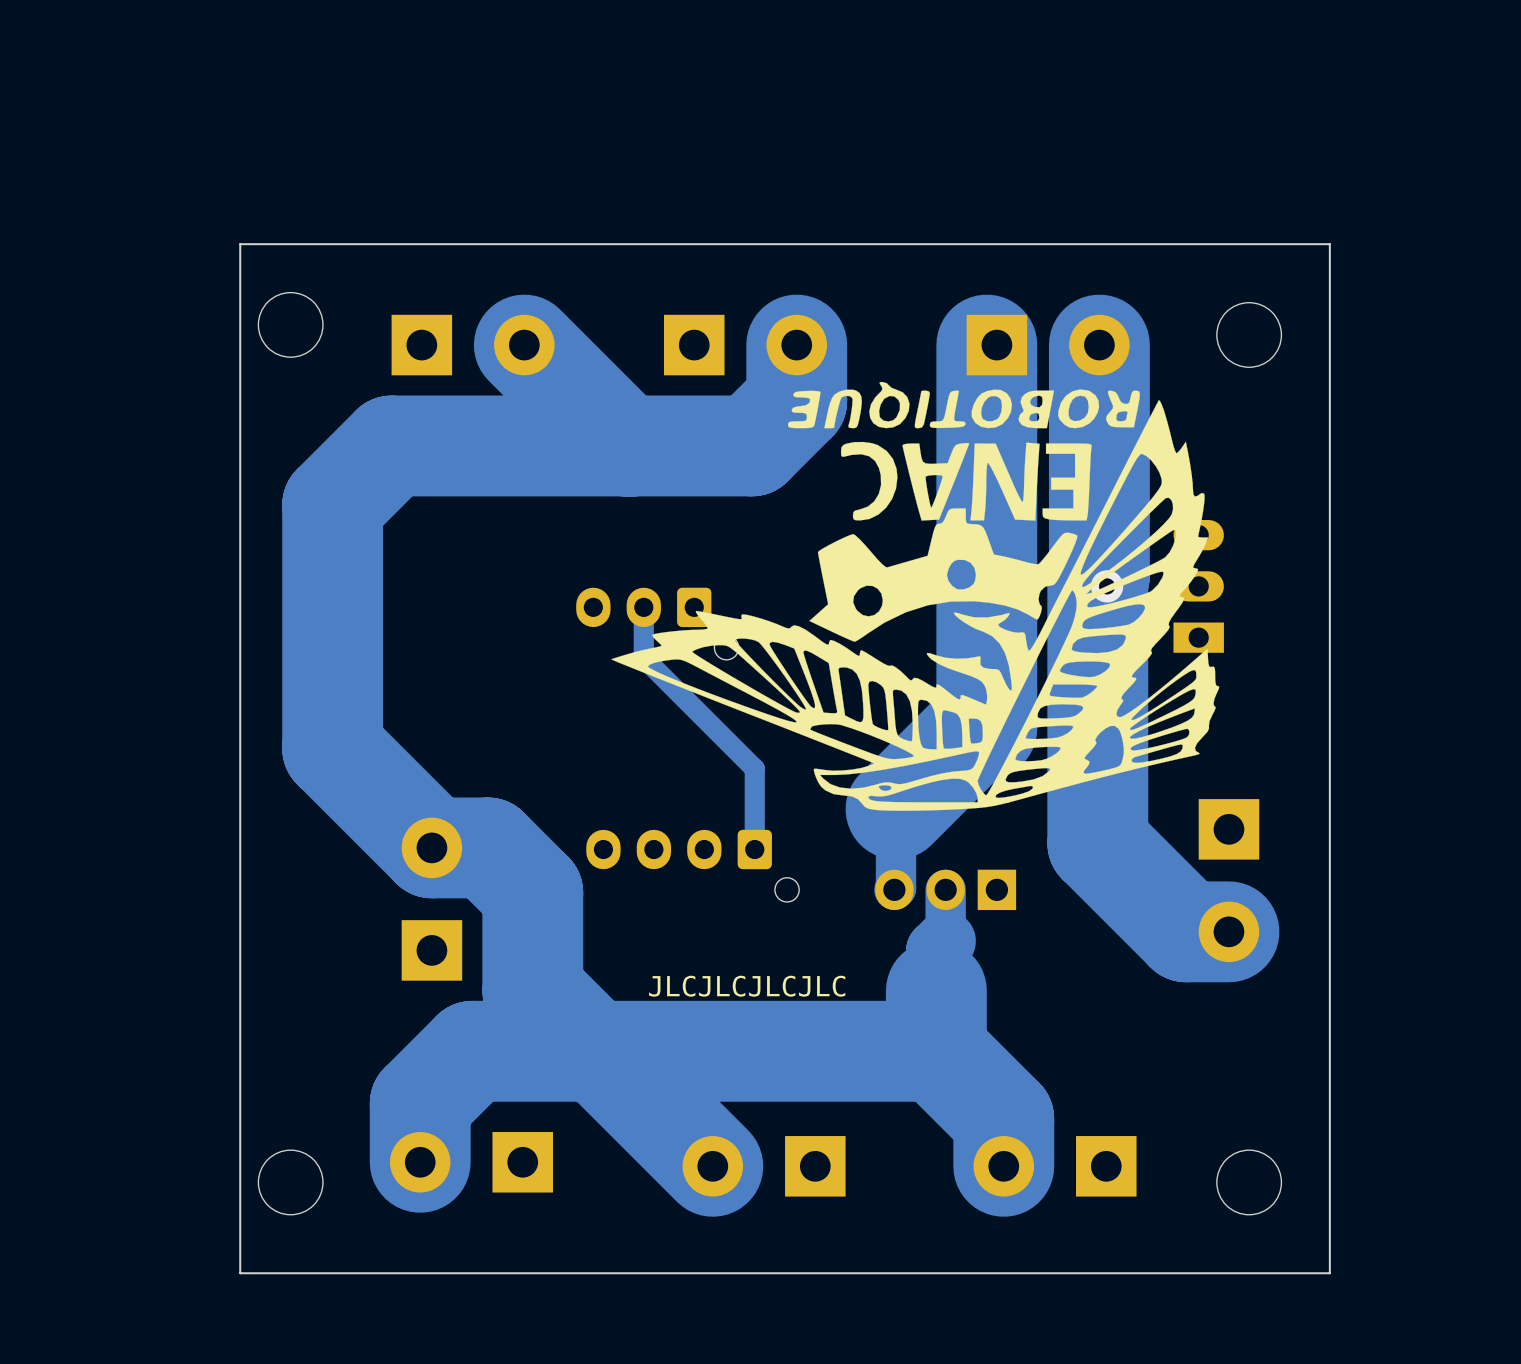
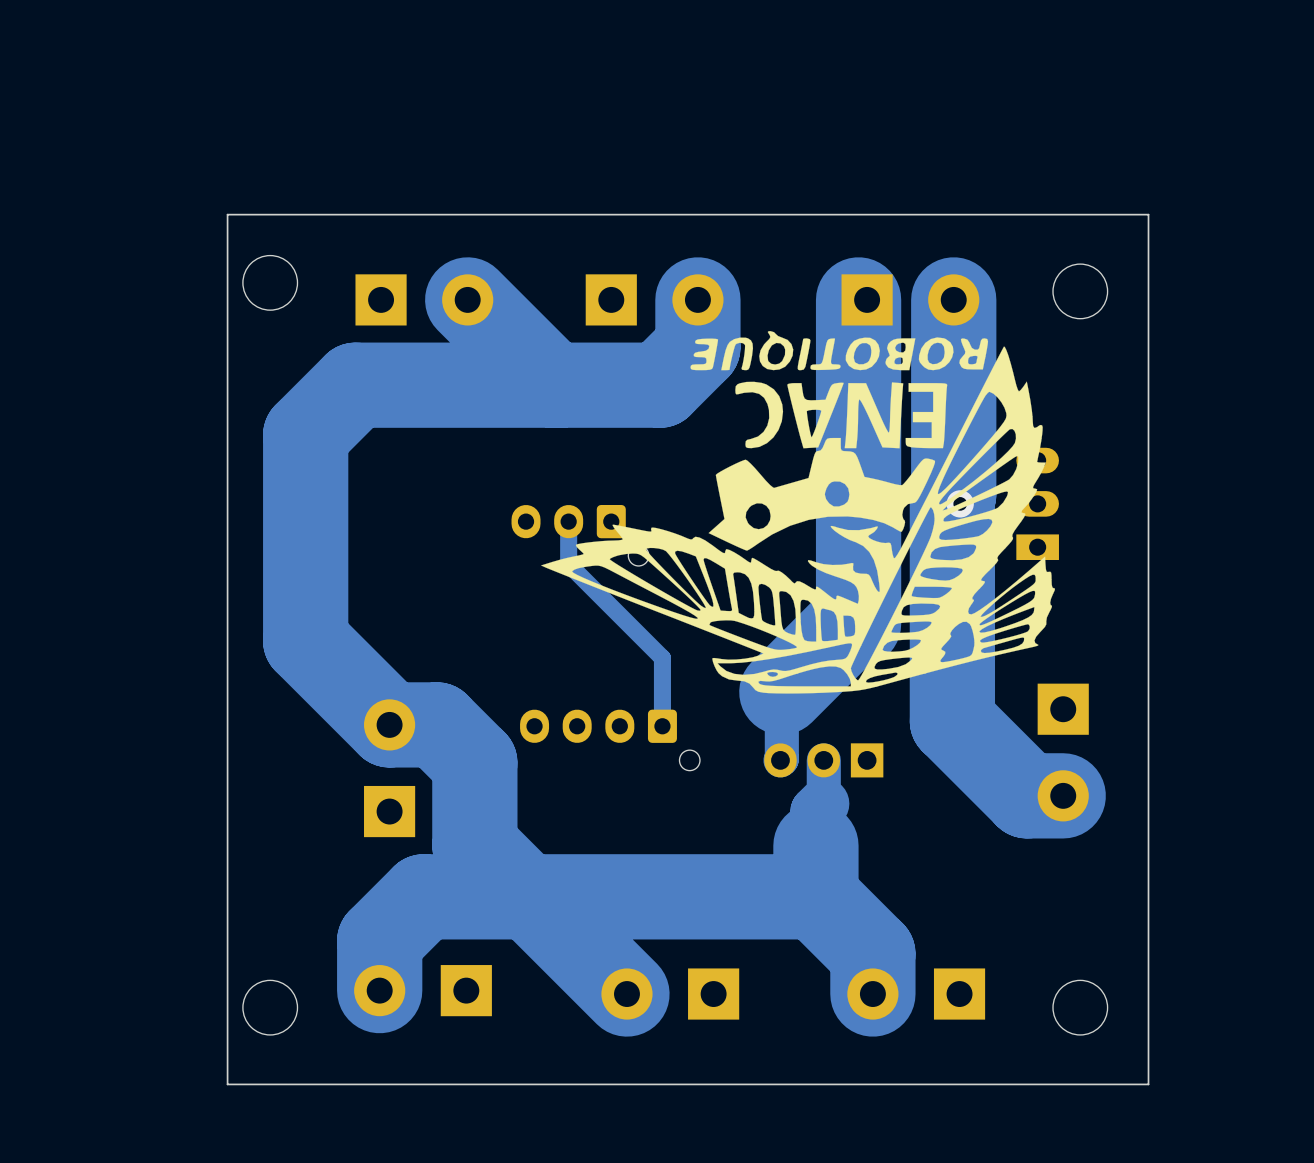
text: JLCJLCJLCJLC (747, 986) -> none

